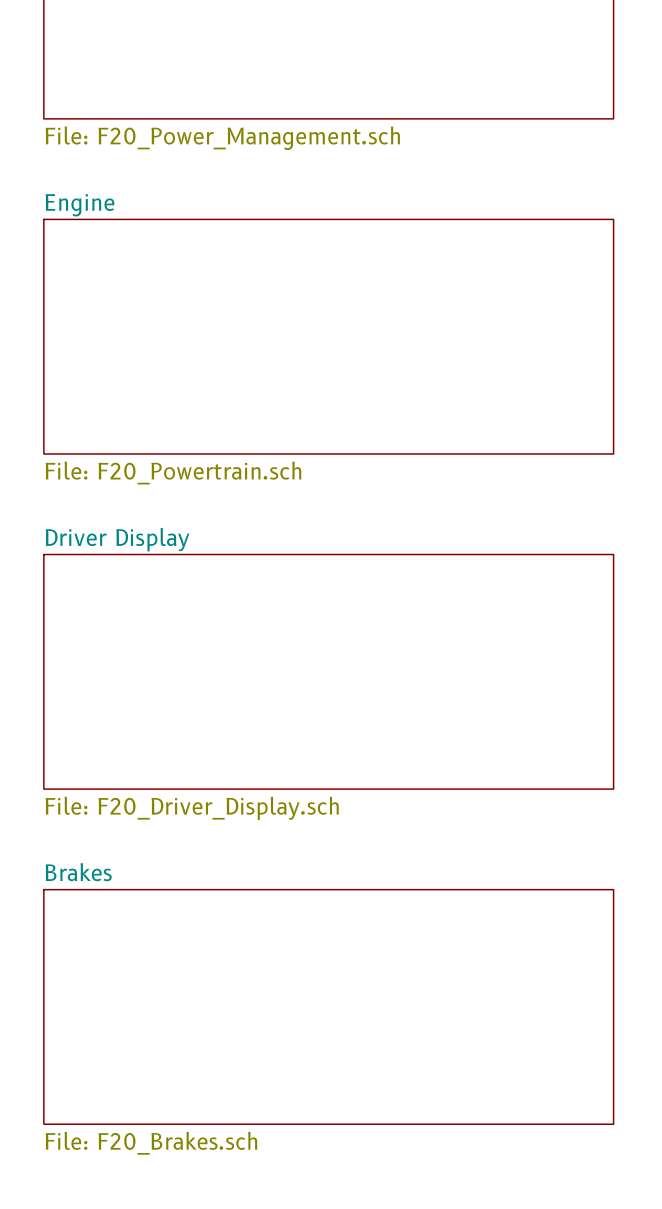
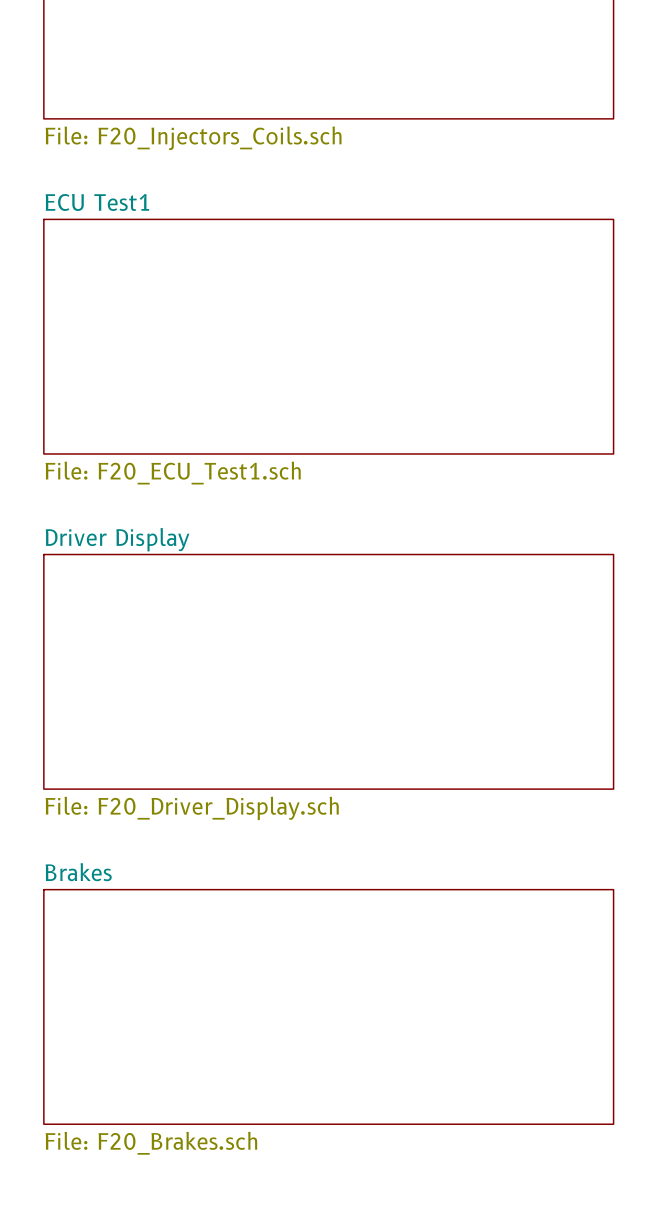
sheet value: File: F20_Power_Management.sch (222, 138) -> File: F20_Injectors_Coils.sch (193, 138)
sheet Engine name: Engine (79, 205) -> ECU Test1 (97, 202)
sheet Engine value: File: F20_Powertrain.sch (173, 473) -> File: F20_ECU_Test1.sch (173, 473)

